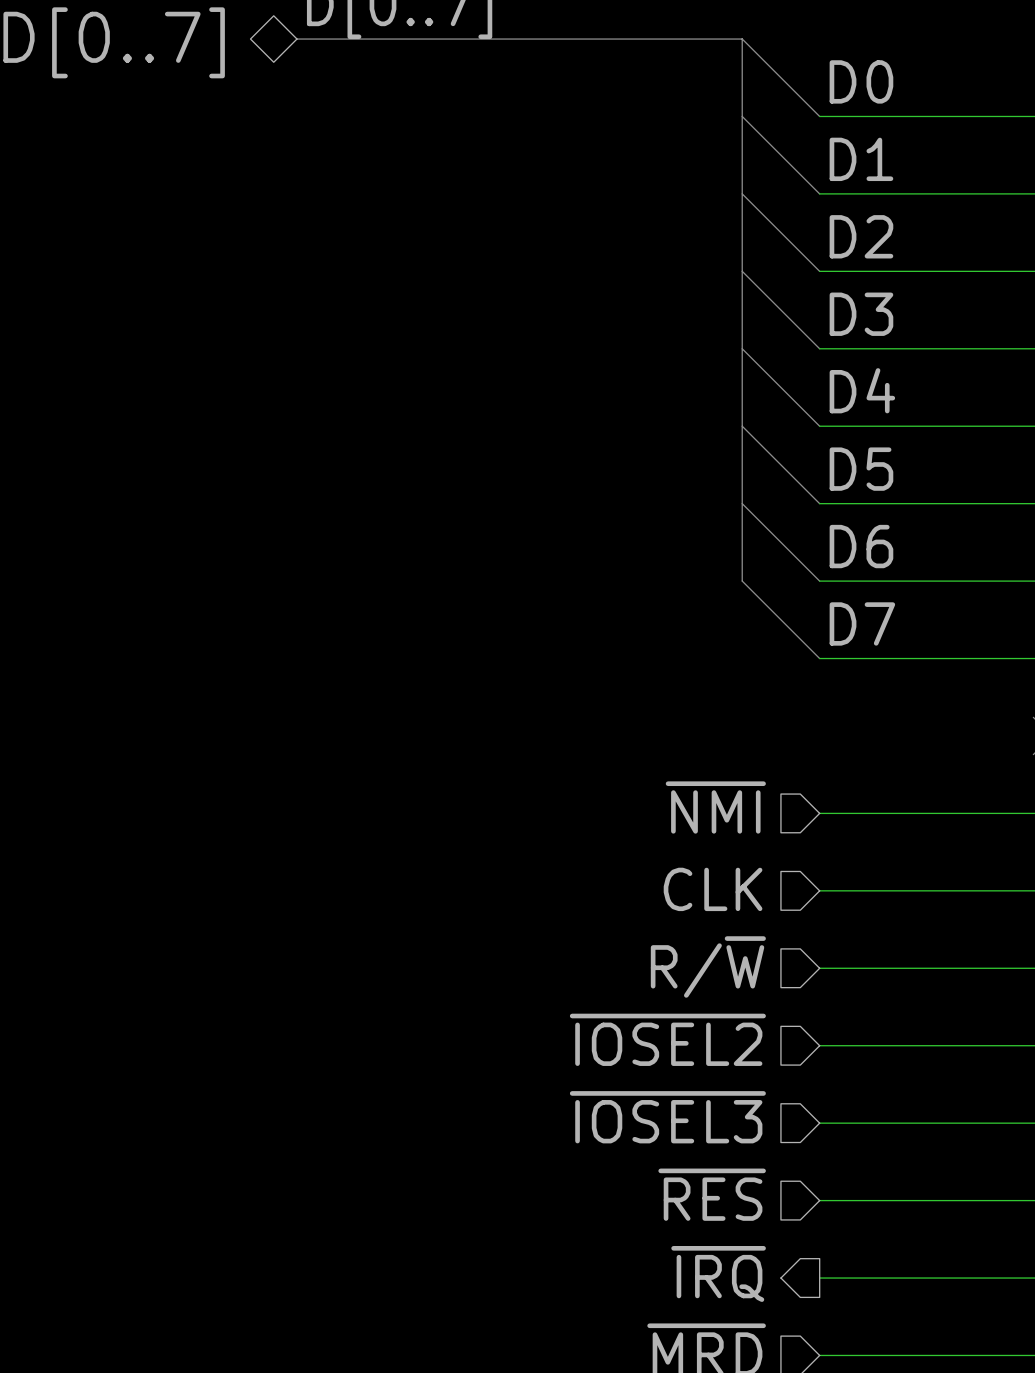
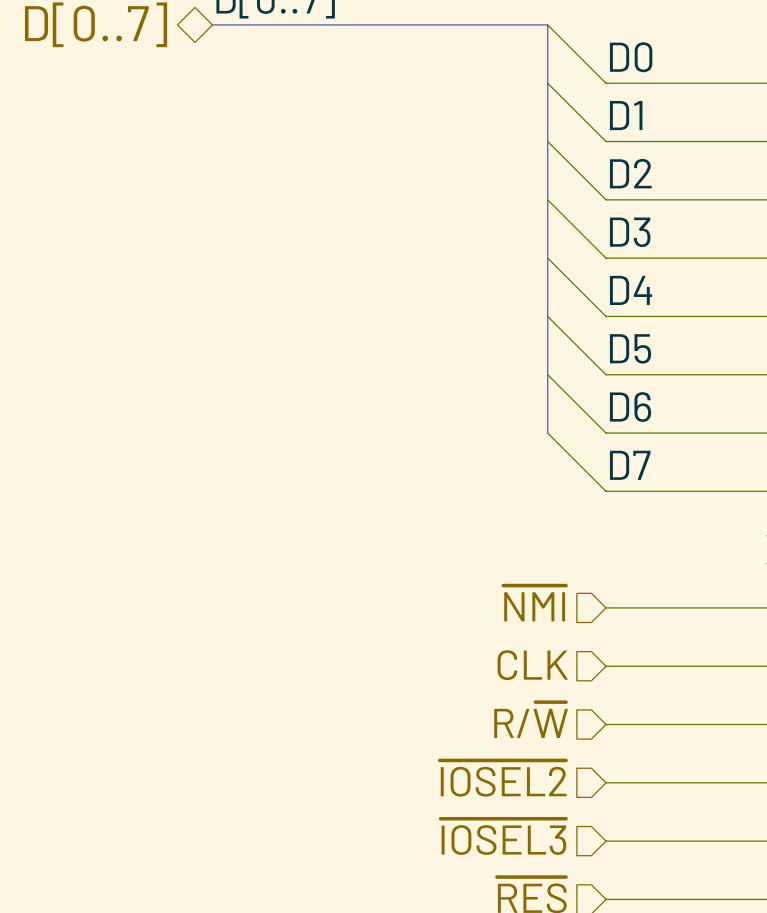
bus: (742, 39) (819, 116) -> none
bus: (742, 116) (819, 193) -> none
bus: (742, 193) (819, 271) -> none
bus: (742, 271) (819, 348) -> none
bus: (742, 348) (819, 426) -> none
bus: (742, 426) (819, 503) -> none
bus: (742, 503) (819, 581) -> none
bus: (742, 581) (819, 658) -> none

